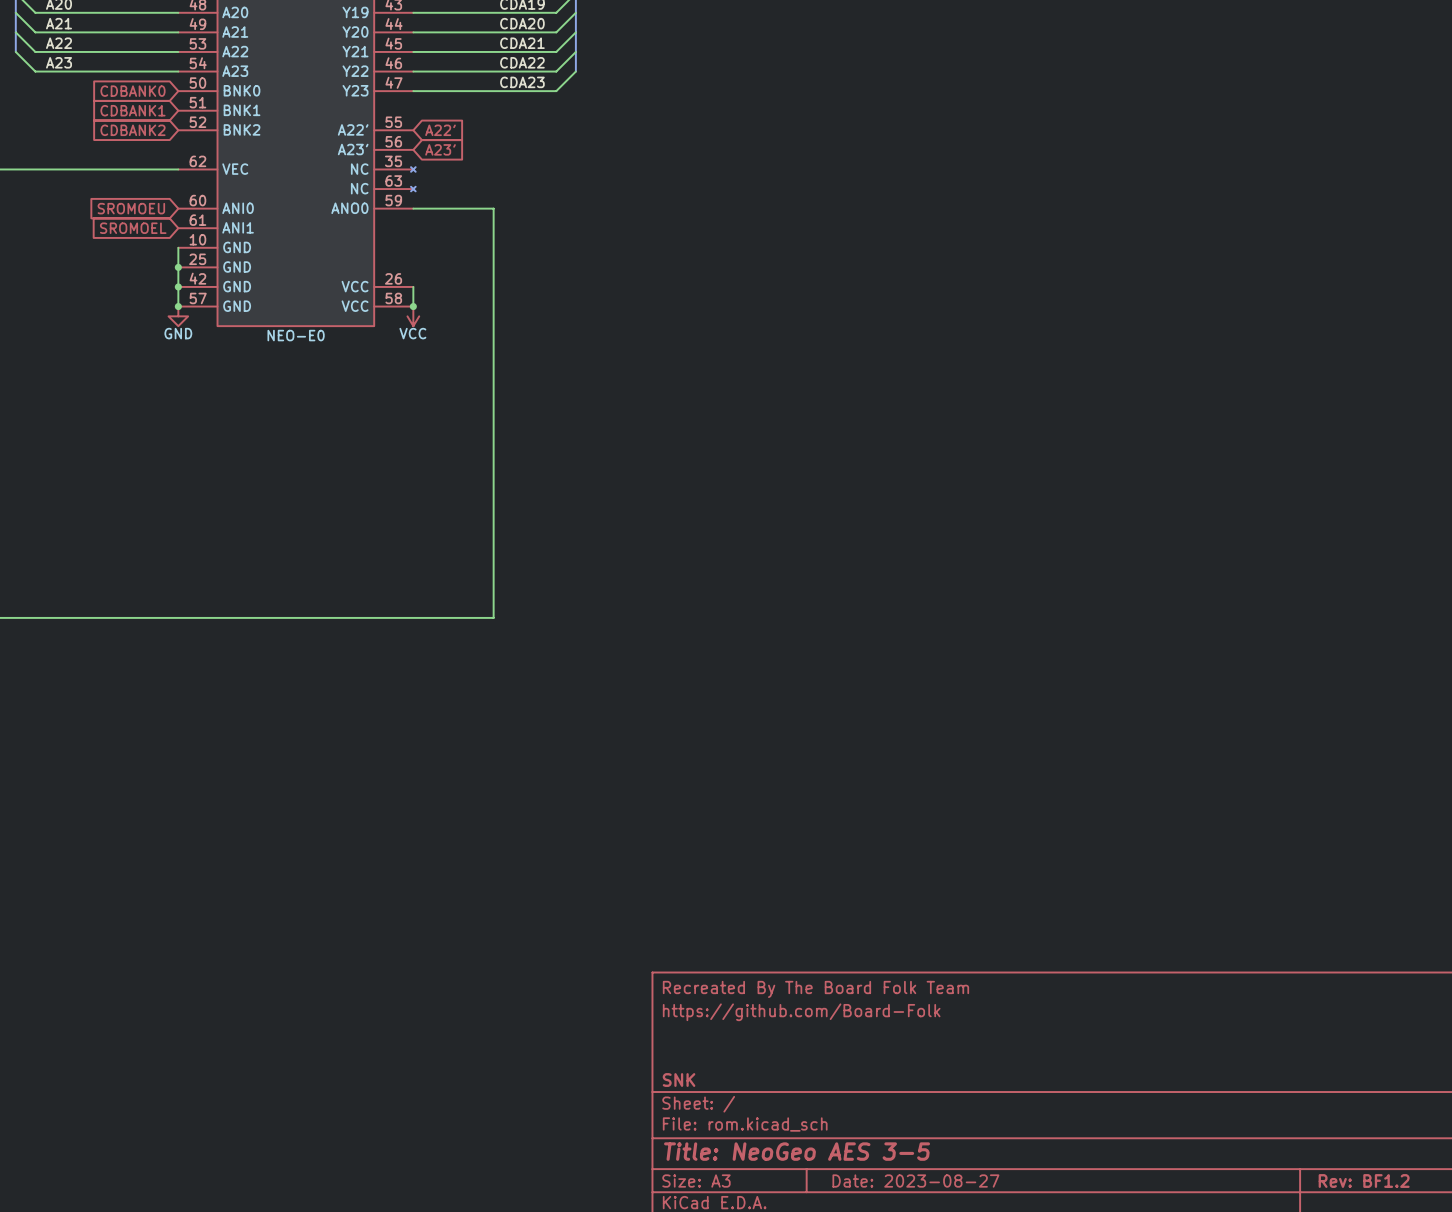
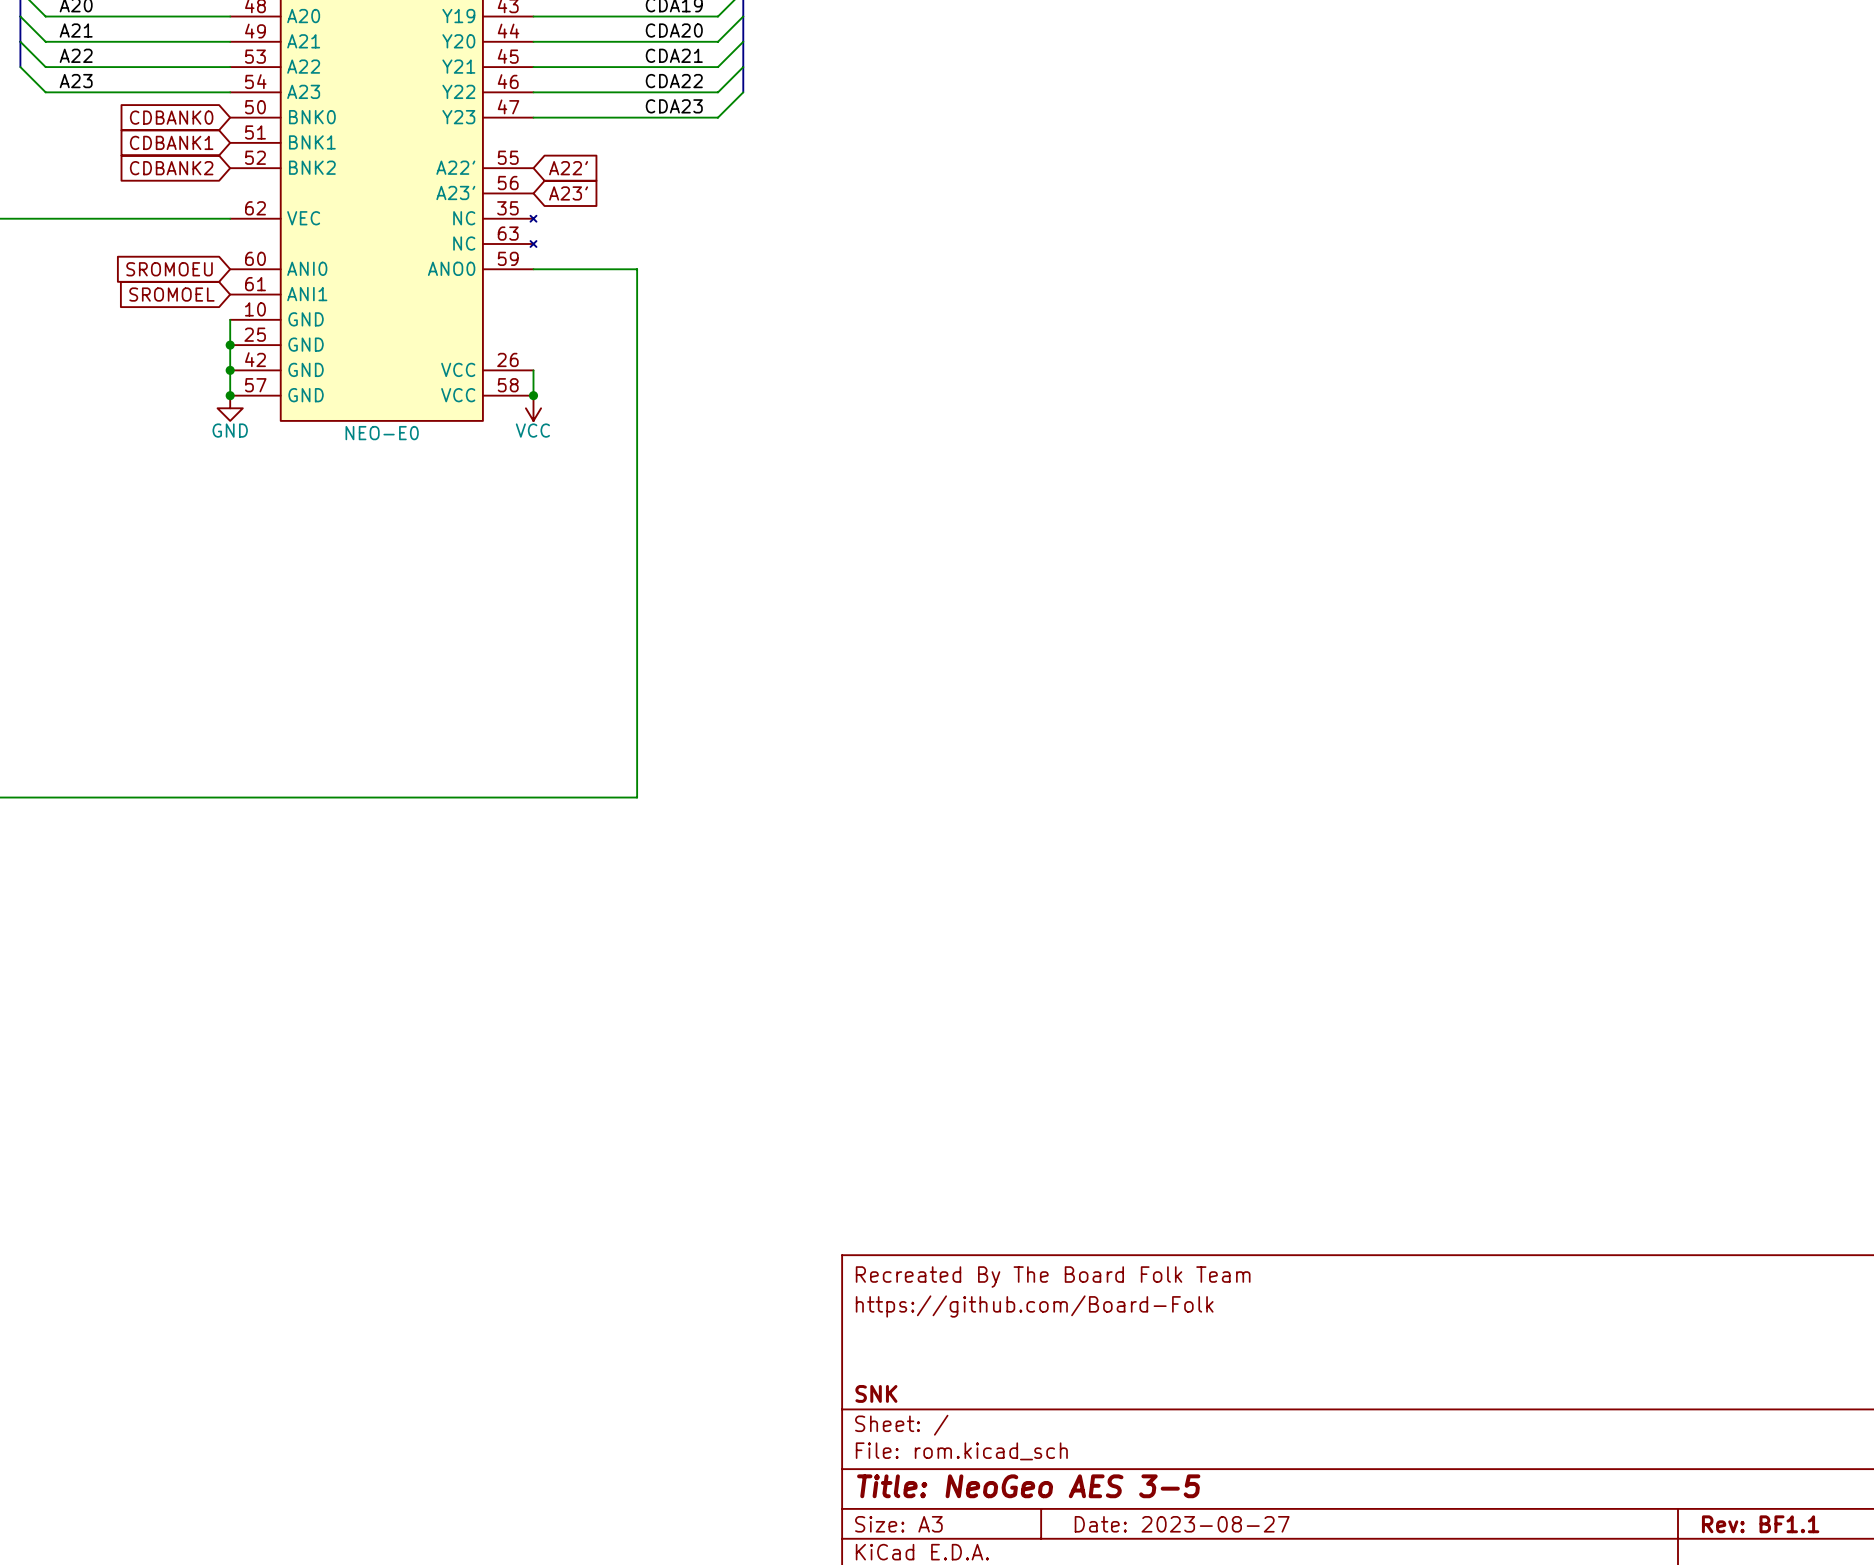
title block: Rev: BF1.2 (1364, 1181) -> Rev: BF1.1 (1760, 1524)

